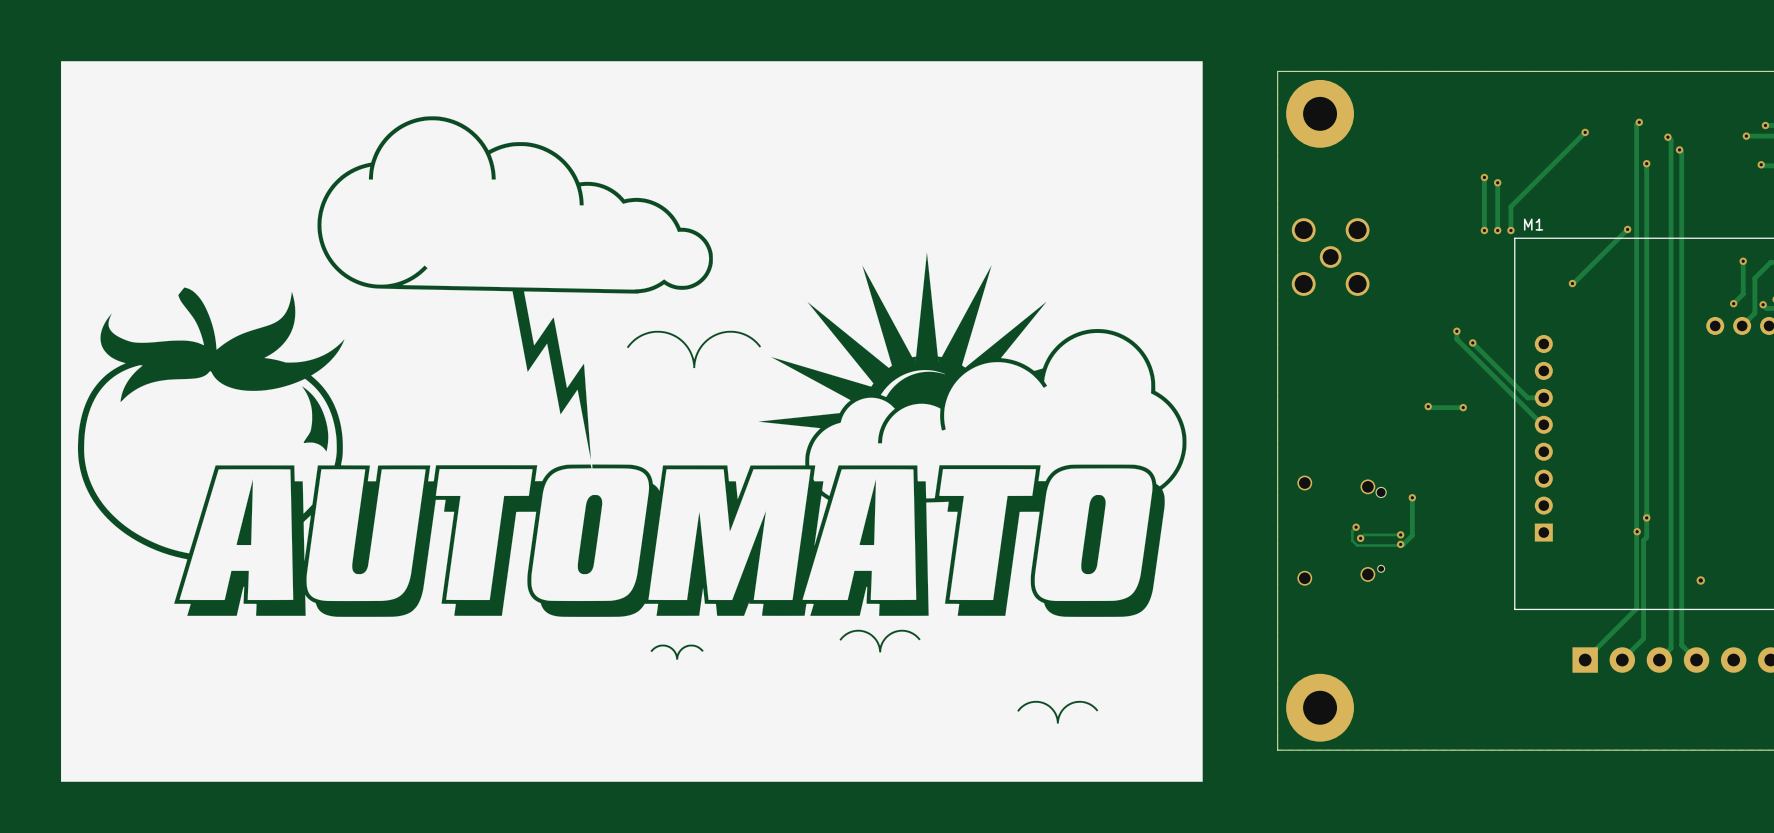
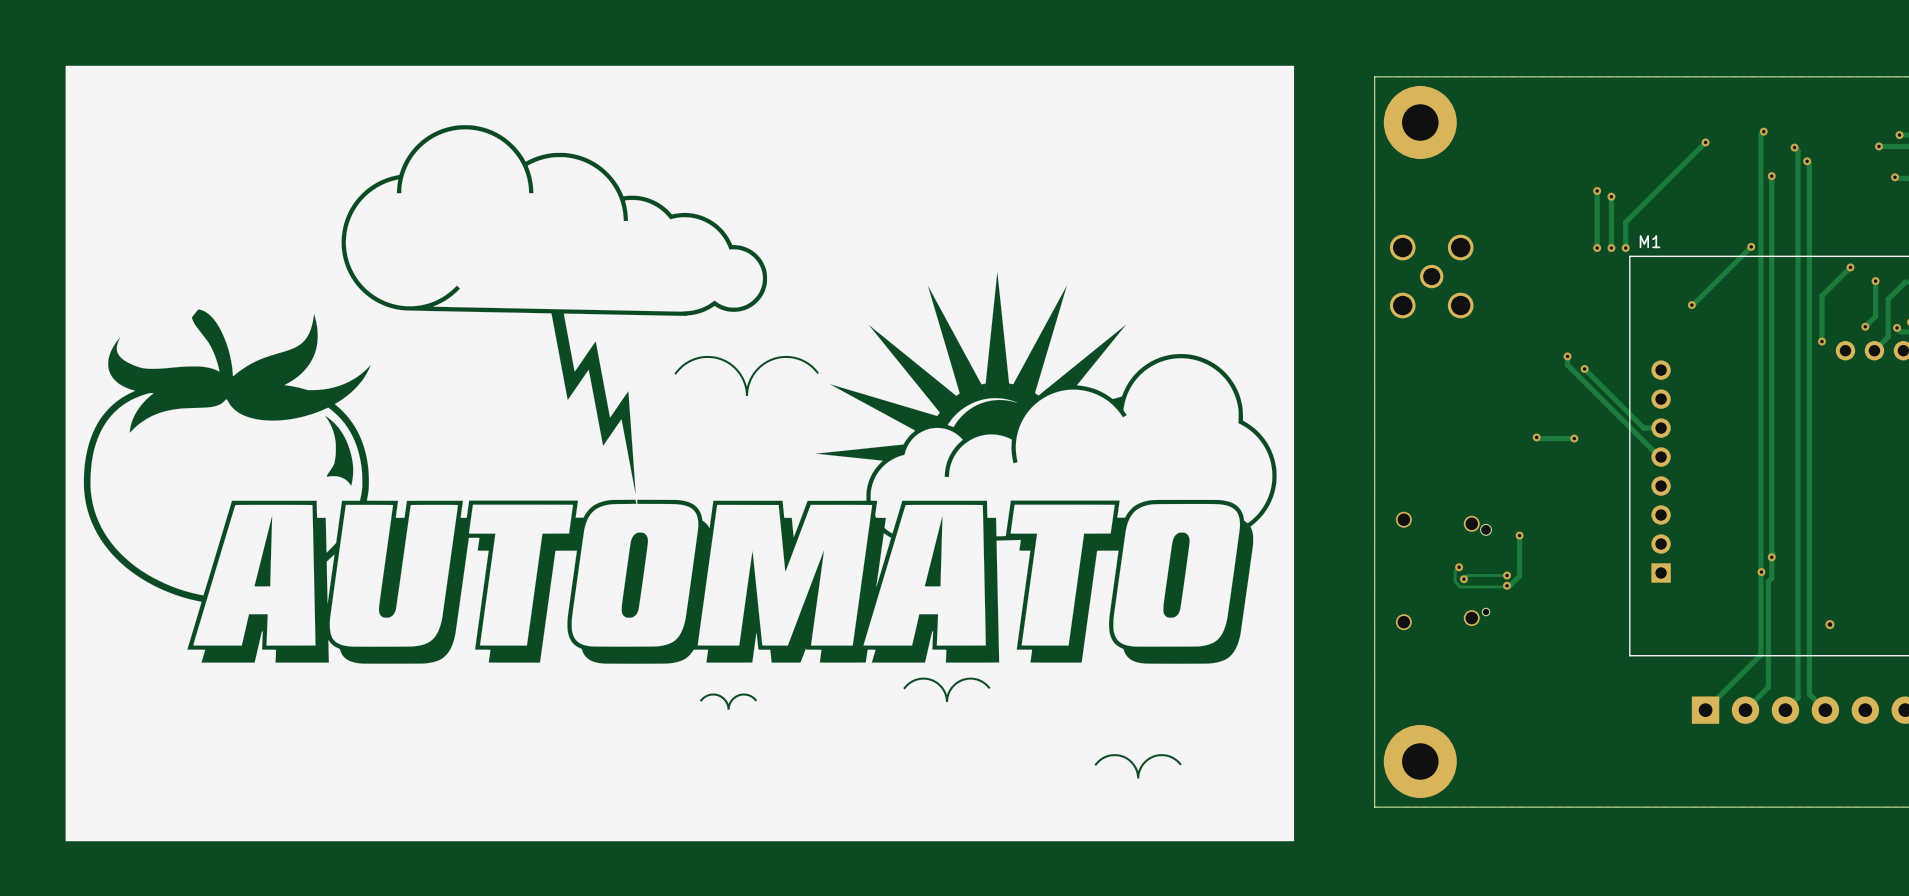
track: none -> (1850, 267) (1821, 295) (1821, 341)
via: none -> (1850, 267)
via: none -> (1821, 341)

